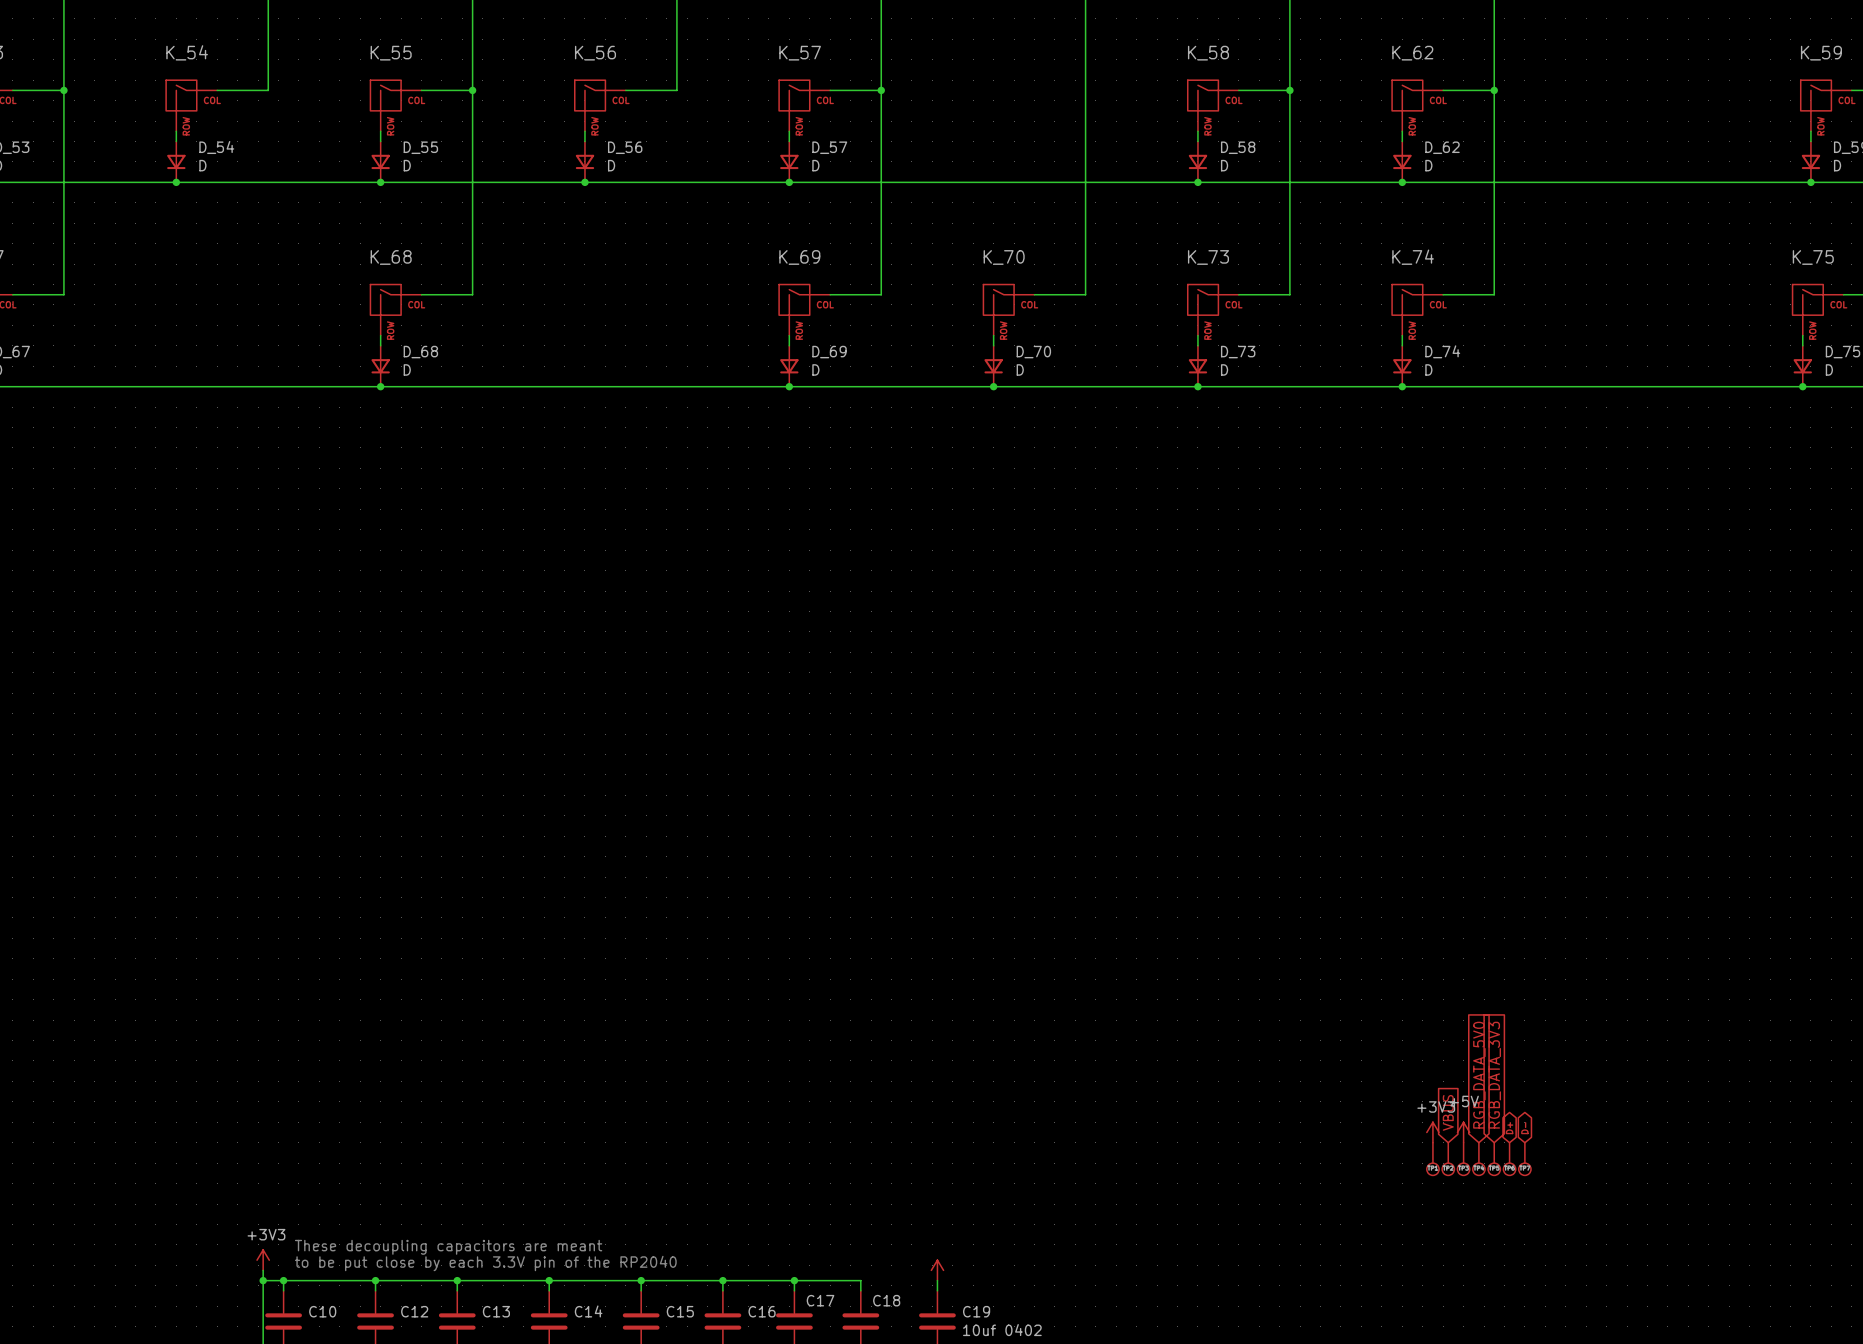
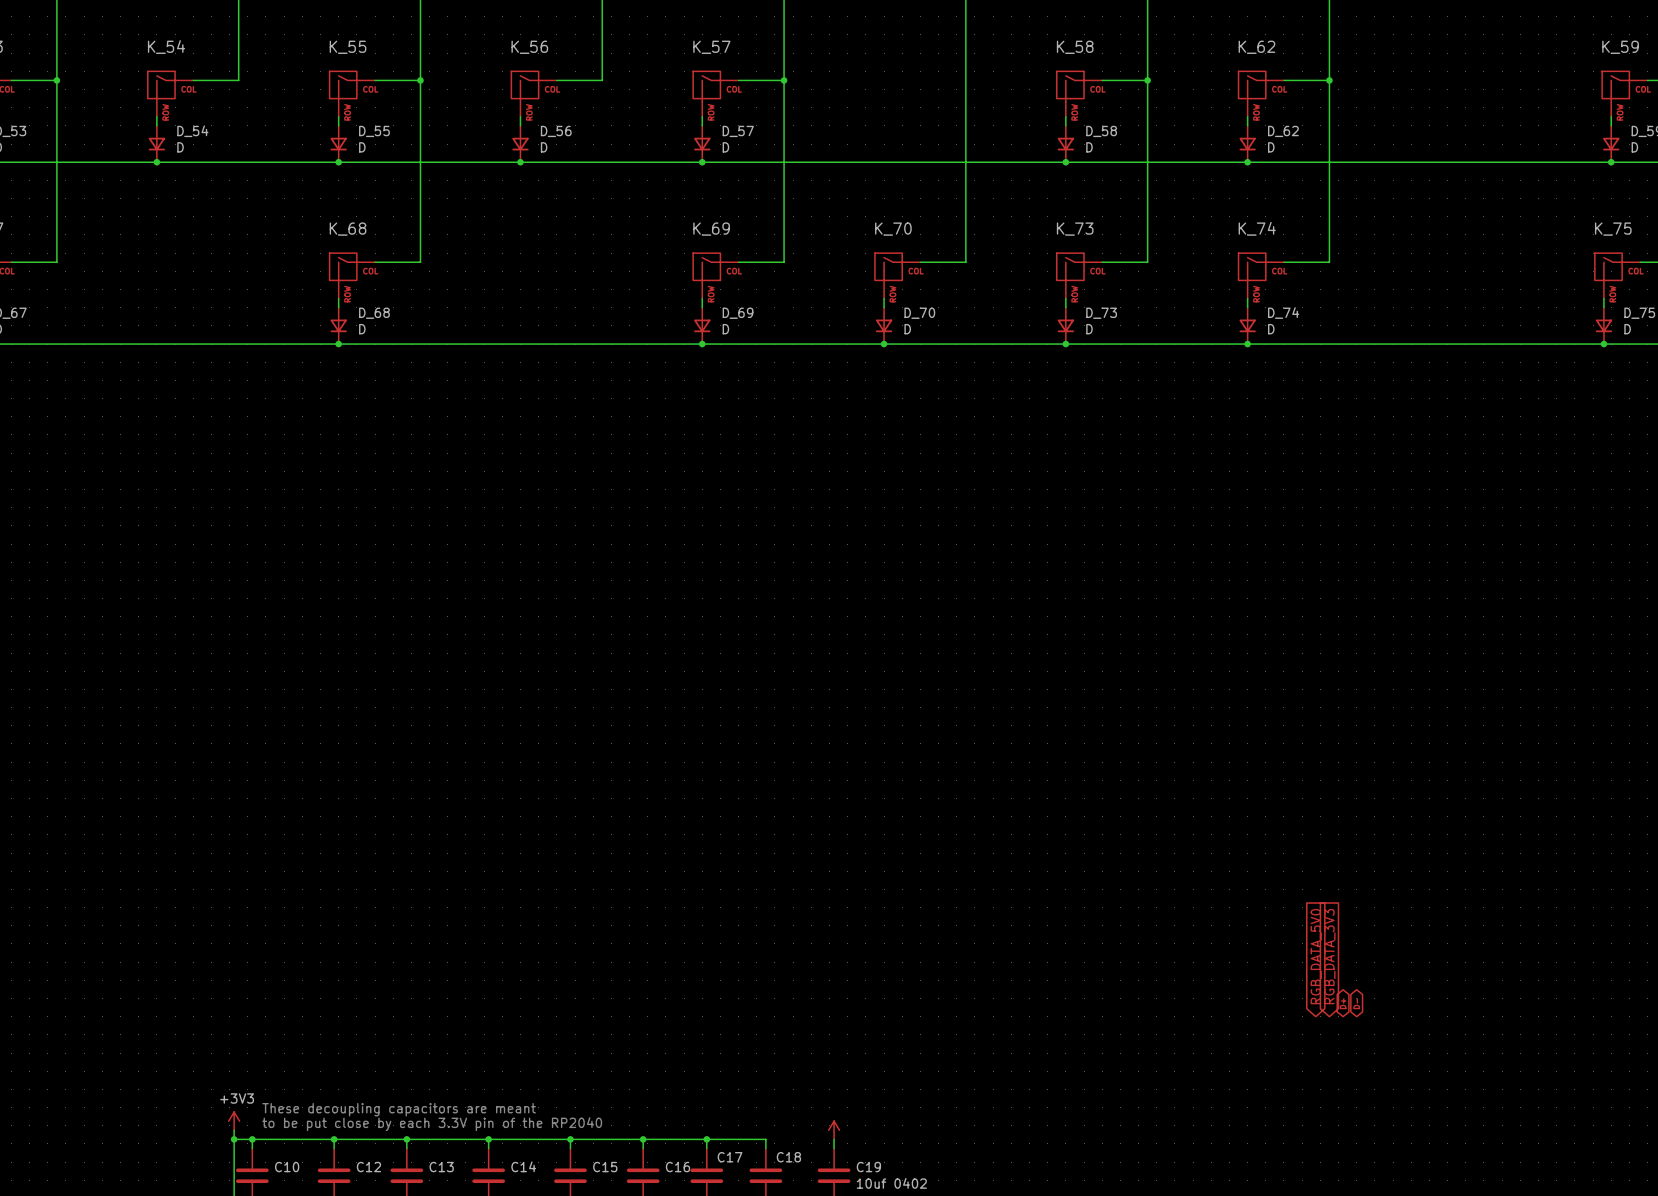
global label: VBUS (1448, 1112) -> none
power symbol: +3V3 (1432, 1132) -> none
power symbol: +5V (1463, 1132) -> none
part: (1432, 1159) -> none
part: (1448, 1159) -> none
part: (1463, 1159) -> none
part: (1478, 1159) -> none
part: (1494, 1159) -> none
part: (1509, 1159) -> none
part: (1524, 1159) -> none

